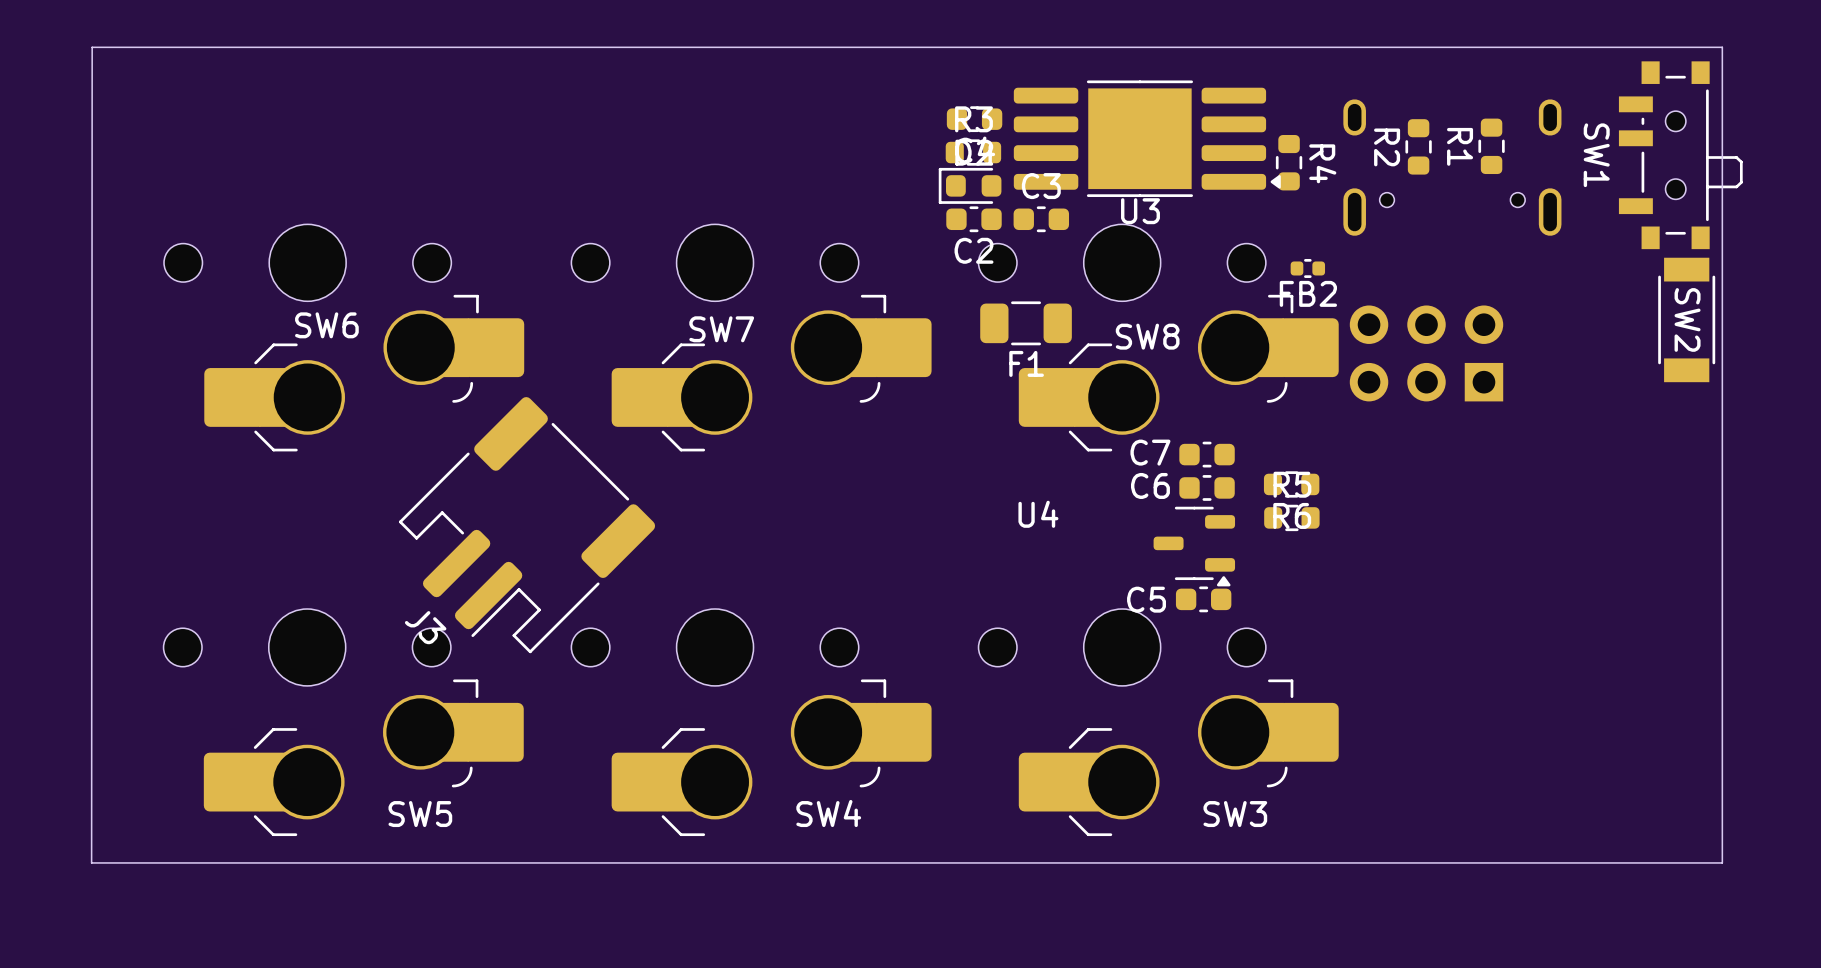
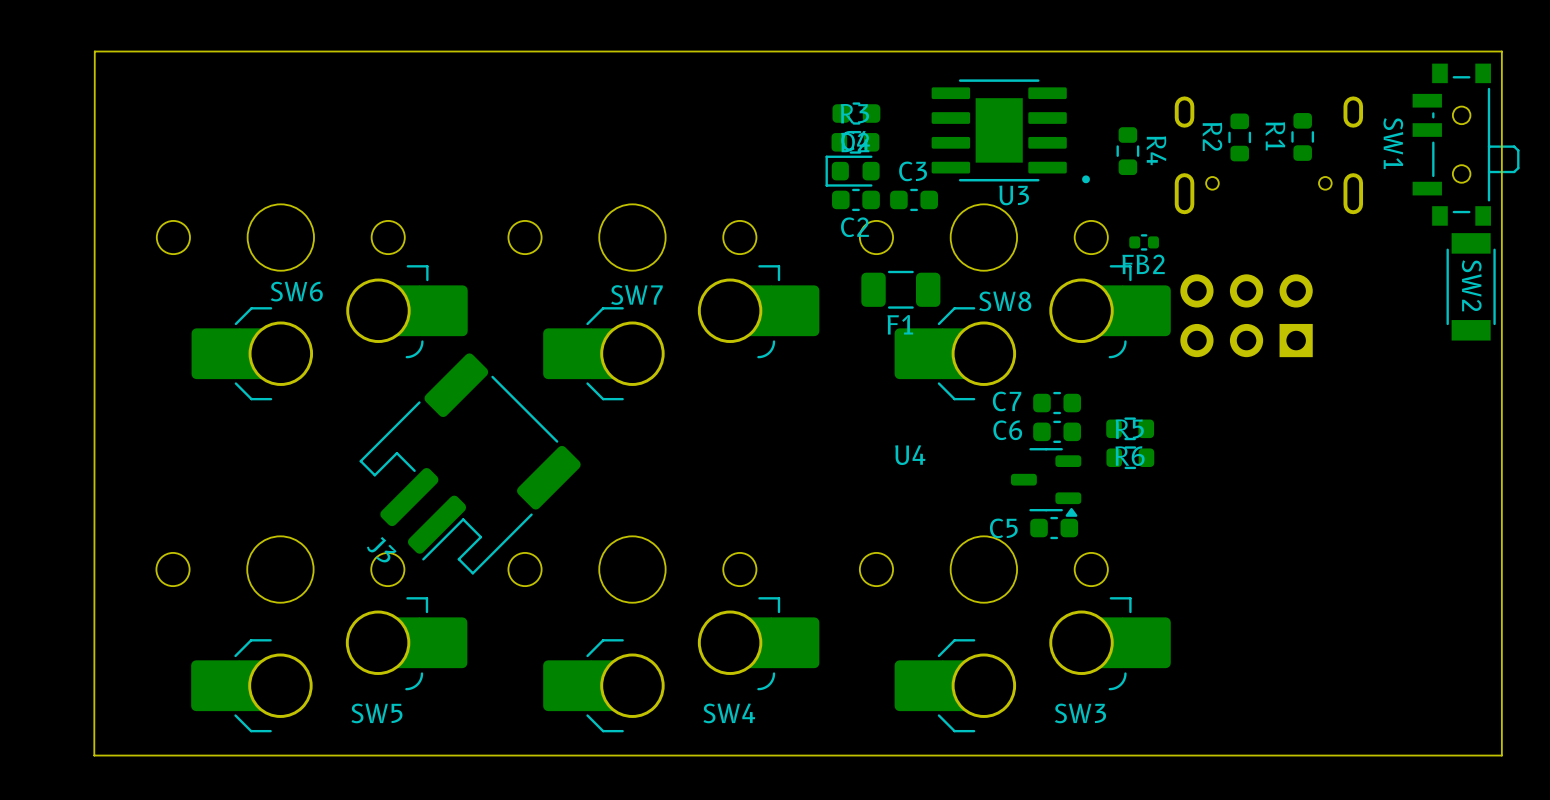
U3 footprint: [1013, 80, 1281, 197] -> [931, 79, 1090, 184]

